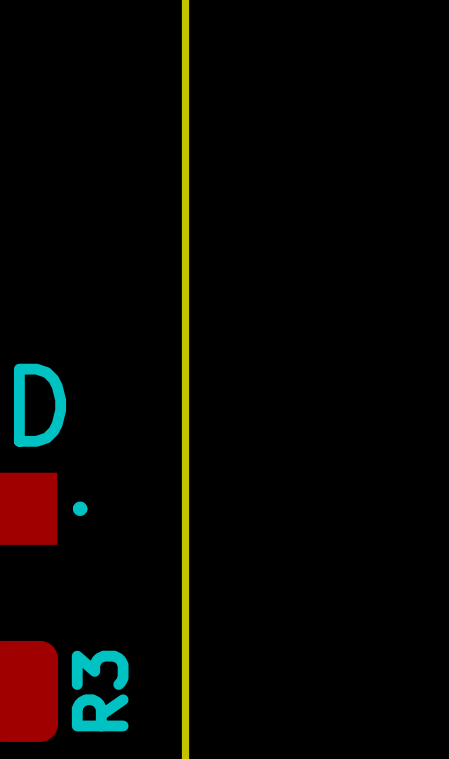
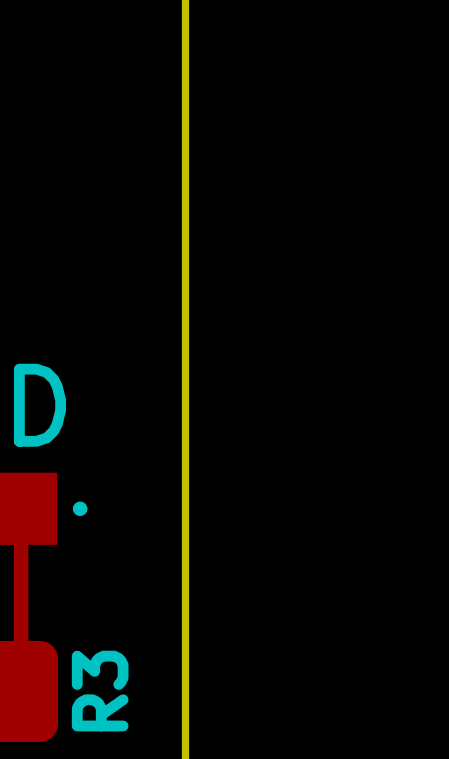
track: none -> (21, 516) (21, 691)

